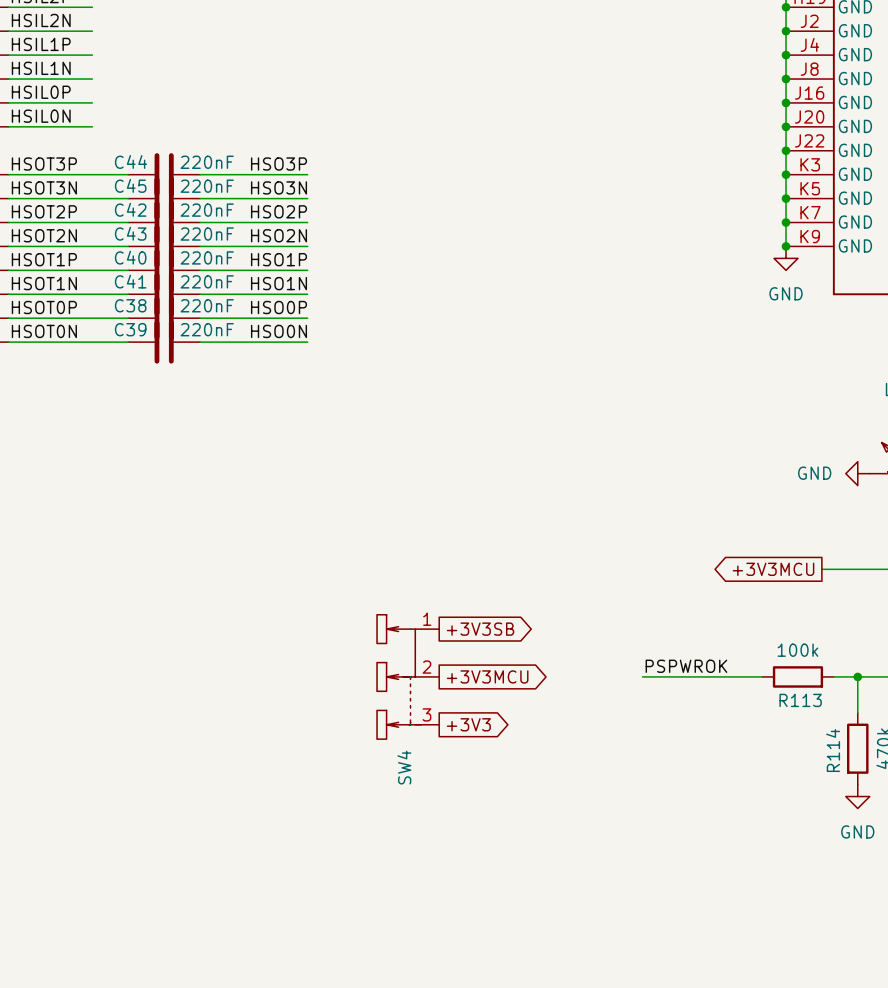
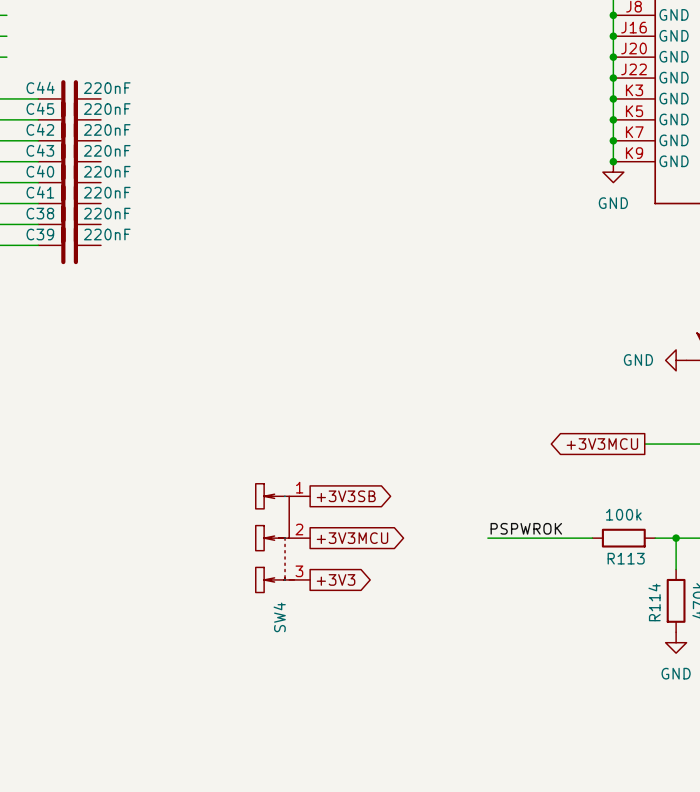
label: HSO3P (278, 164) -> none
wire: (200, 174) (307, 174) -> none
label: HSO3N (278, 187) -> none
wire: (200, 198) (307, 198) -> none
label: HSO2P (278, 211) -> none
wire: (200, 222) (307, 222) -> none
label: HSO2N (278, 235) -> none
wire: (200, 246) (307, 246) -> none
label: HSO1P (278, 259) -> none
wire: (200, 270) (307, 270) -> none
label: HSO1N (278, 283) -> none
wire: (200, 294) (307, 294) -> none
label: HSO0P (278, 307) -> none
wire: (200, 318) (307, 318) -> none
label: HSO0N (278, 331) -> none
wire: (200, 342) (307, 342) -> none

